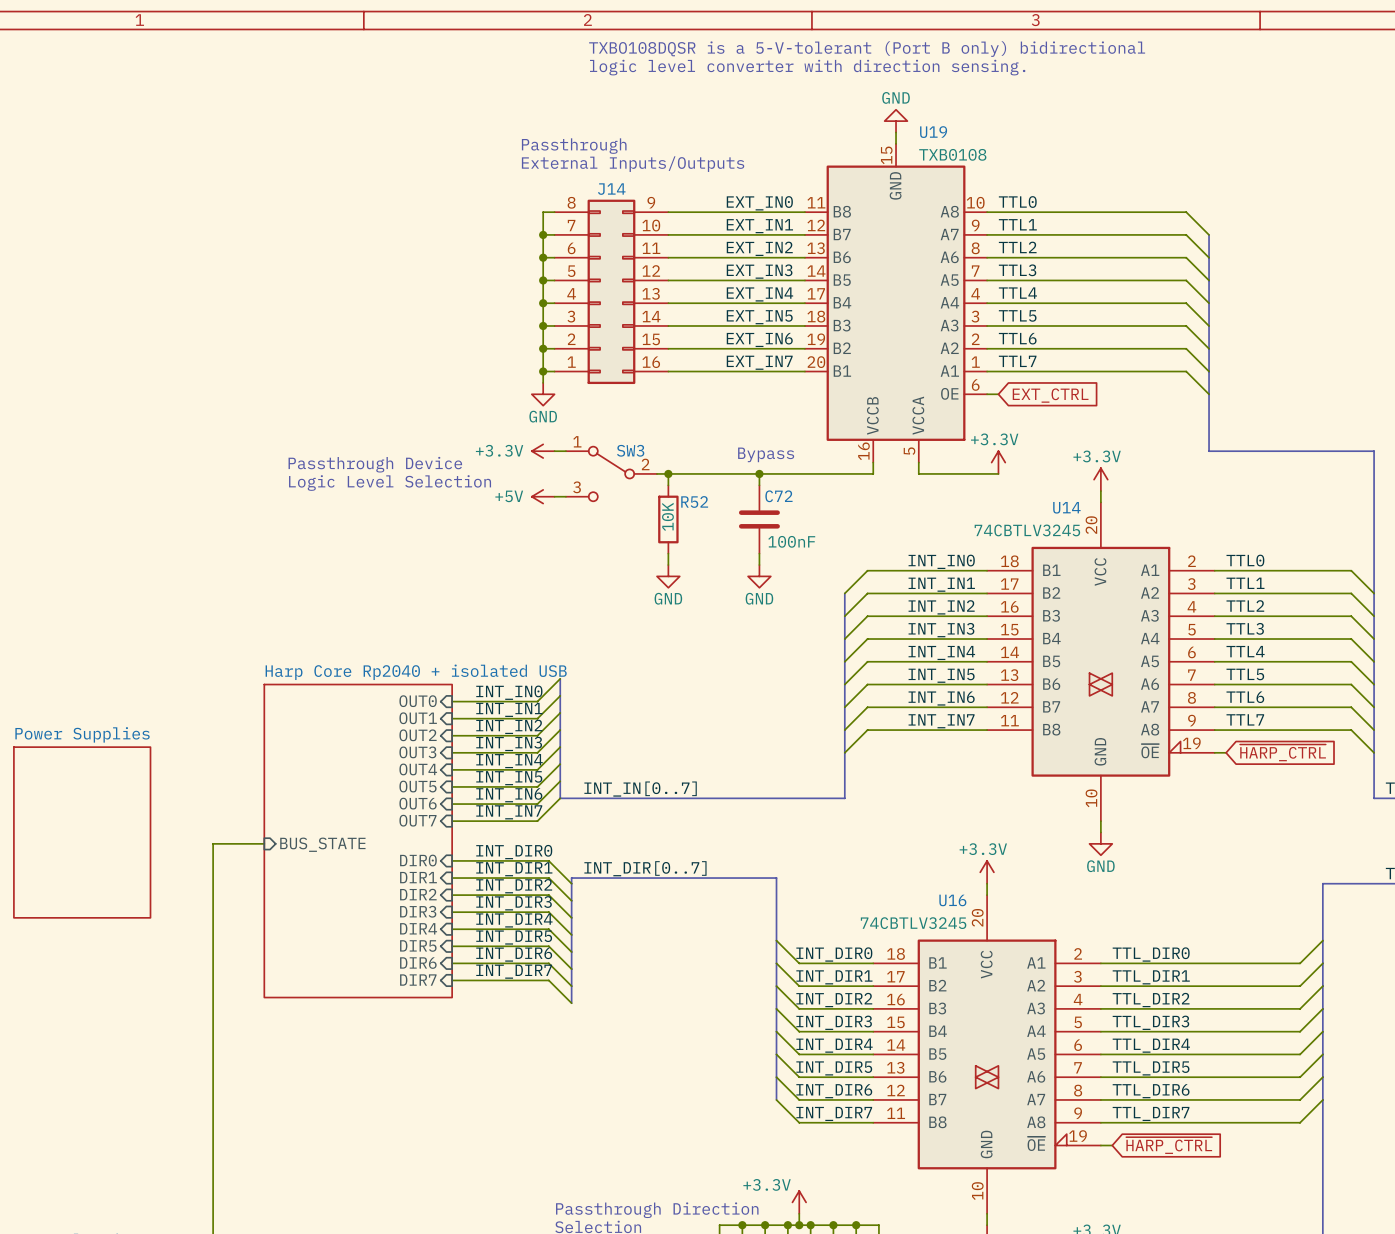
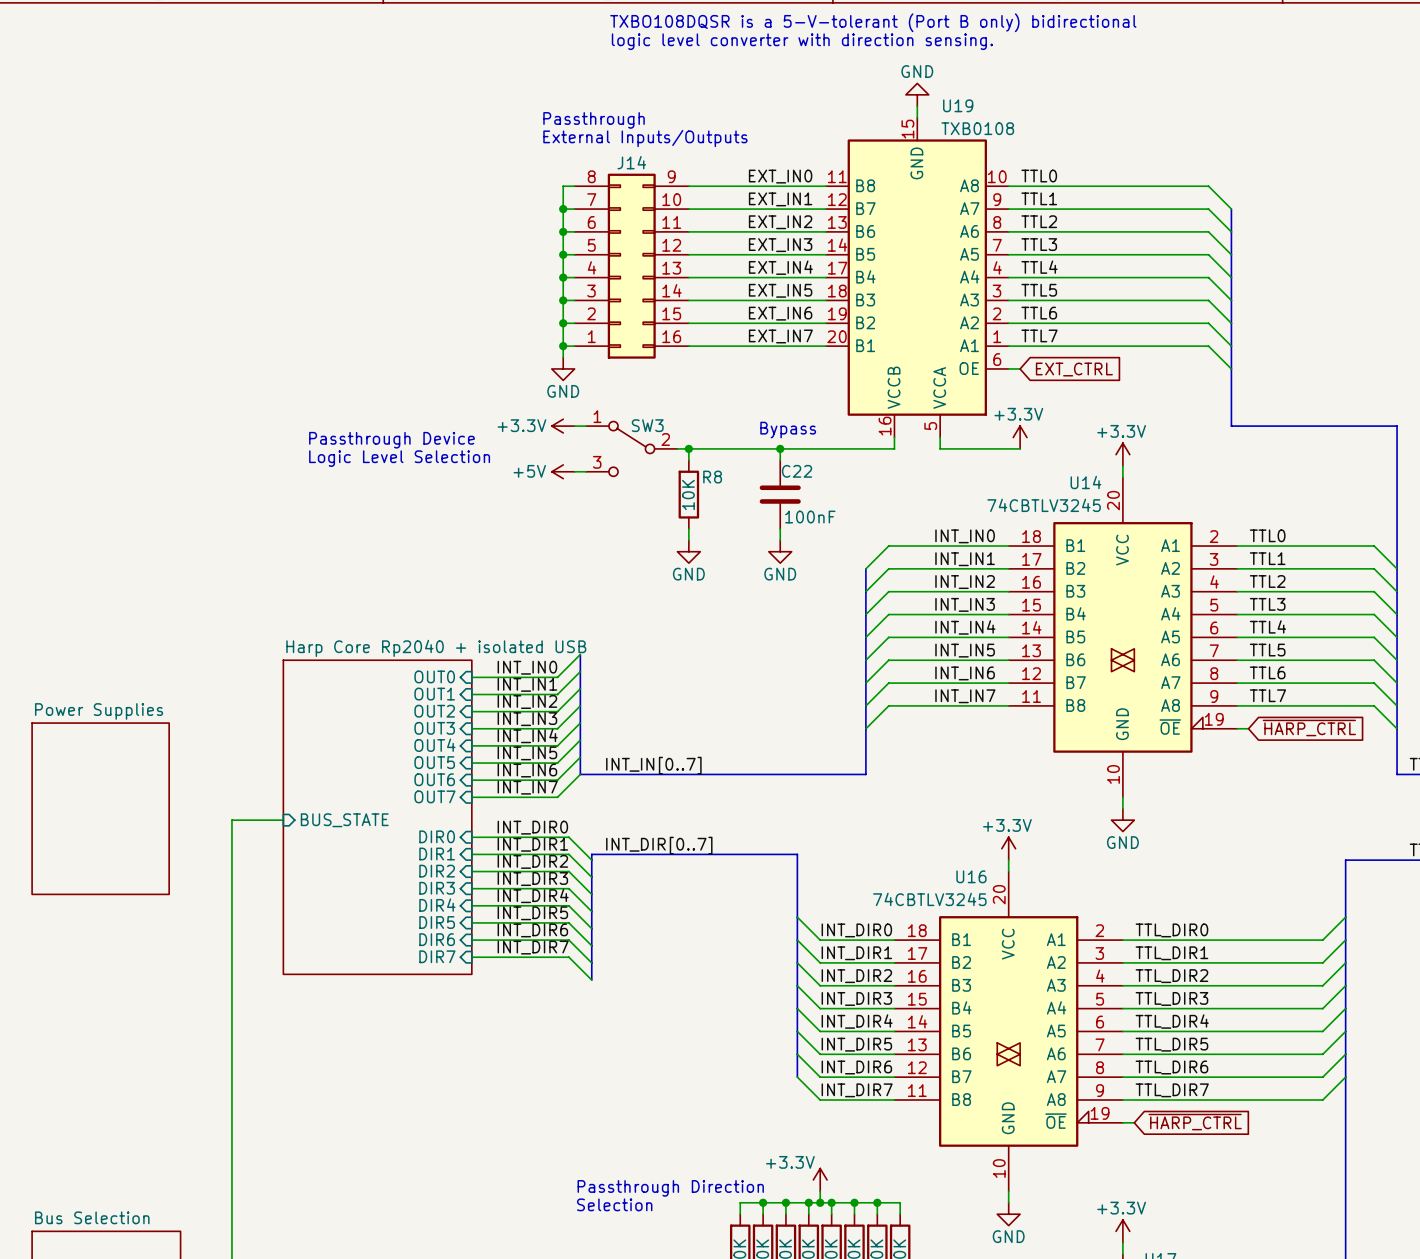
C72 name: C72 (778, 496) -> C22 (797, 471)
R52 name: R52 (694, 501) -> R8 (712, 477)

